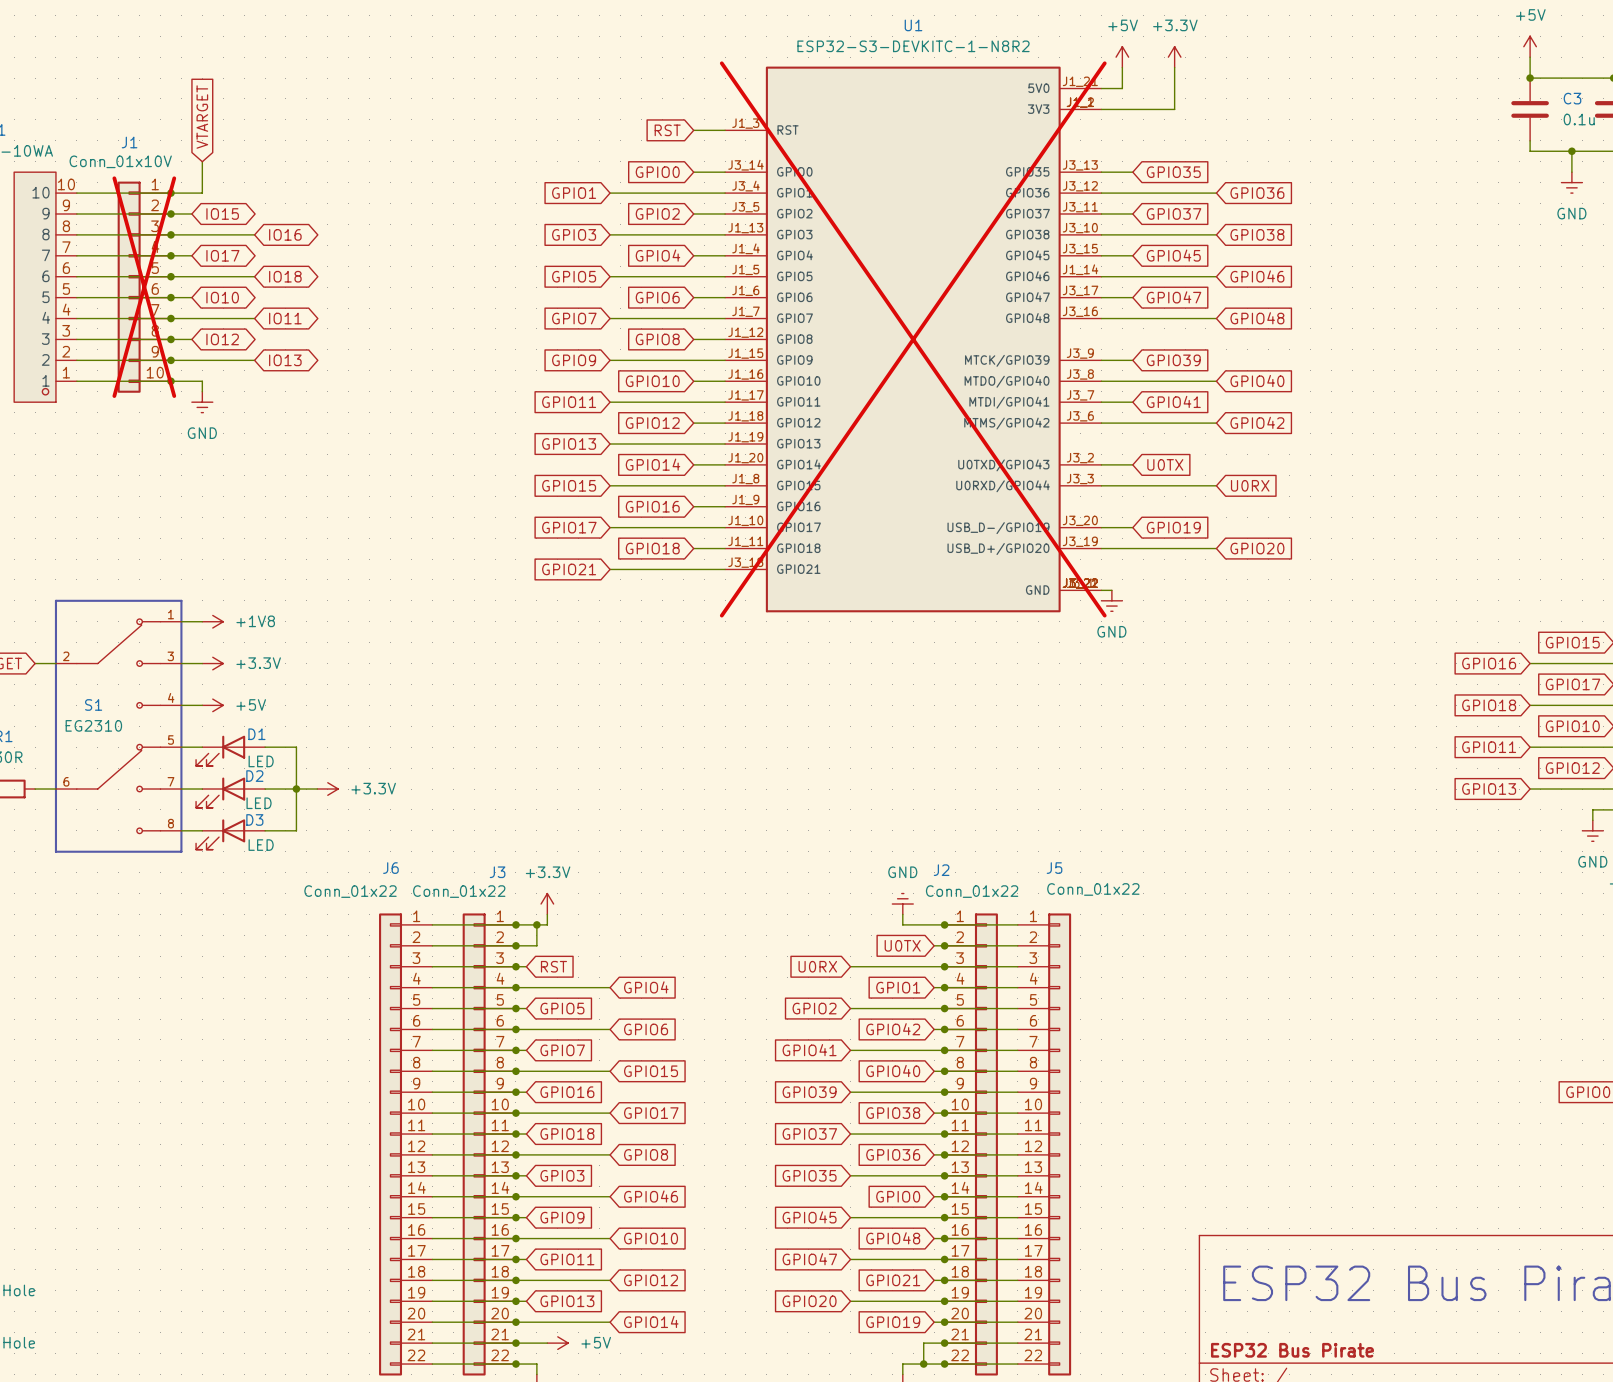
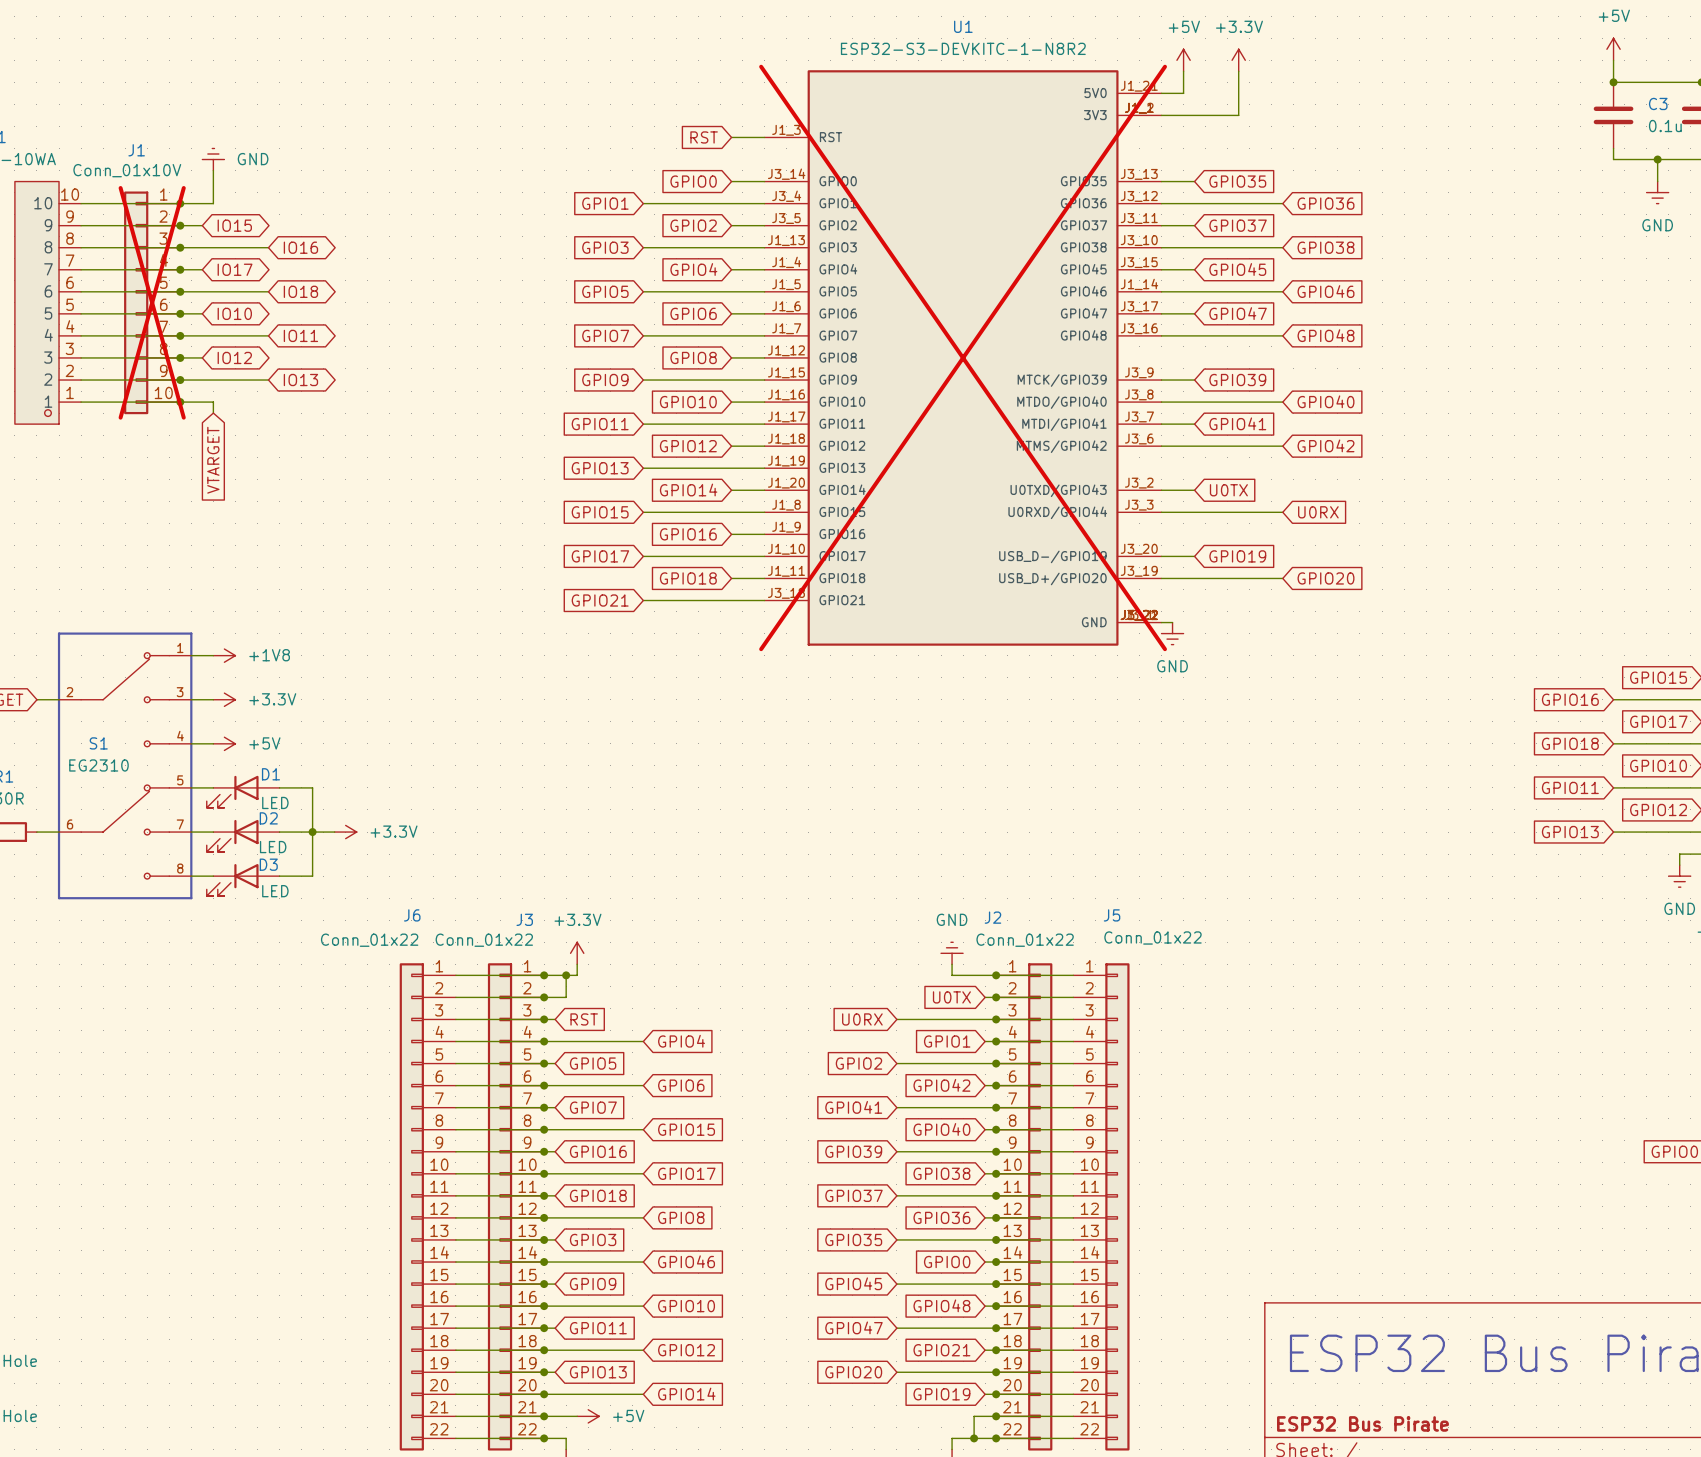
global label: VTARGET (202, 117) -> none
power symbol: none -> GND (213, 159)
power symbol: GND (202, 402) -> none
global label: none -> VTARGET (213, 460)

